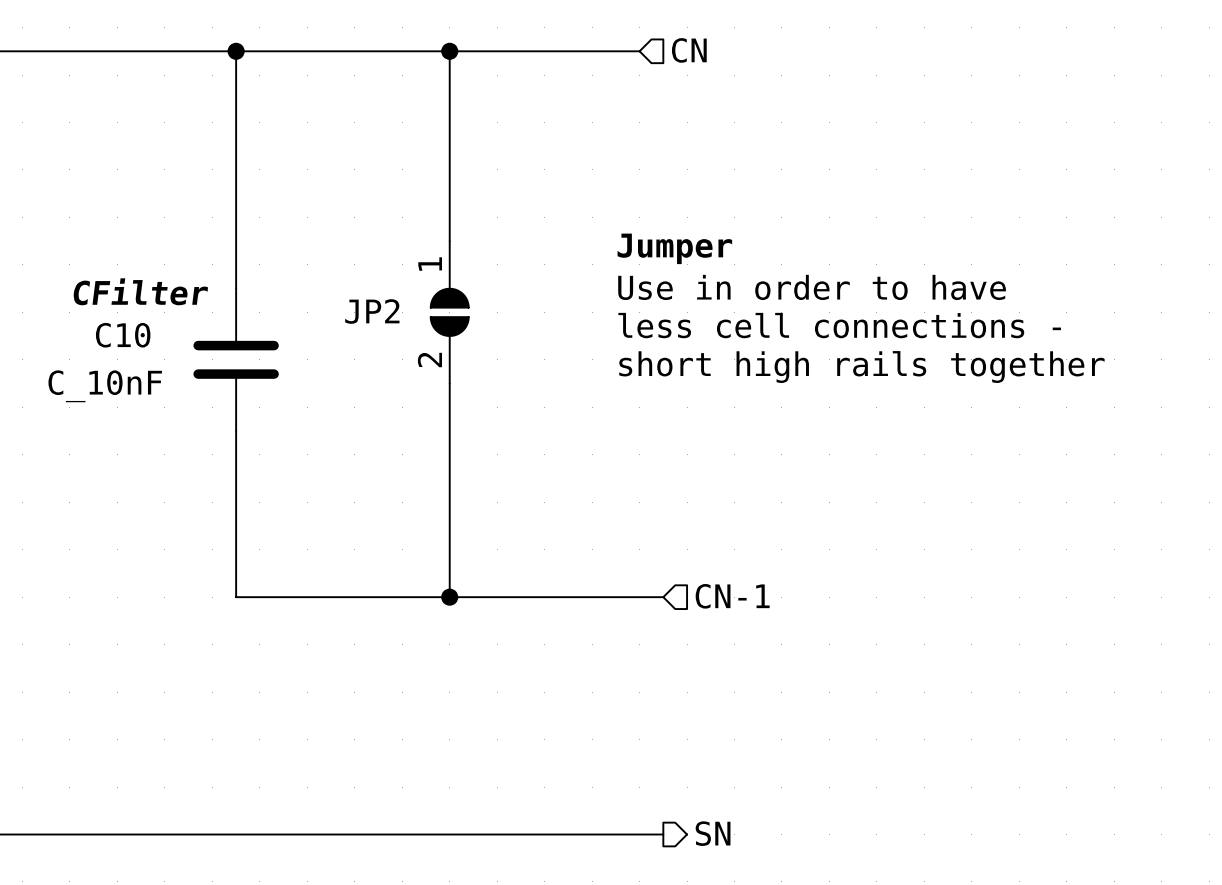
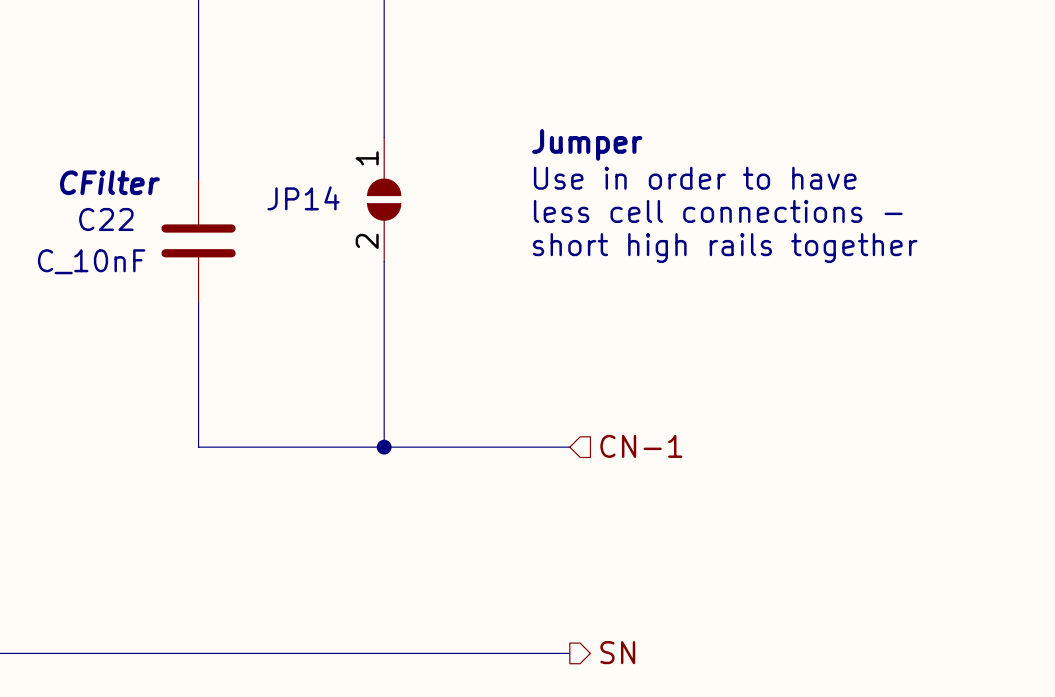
JP2 name: JP2 (372, 311) -> JP14 (303, 198)
C10 name: C10 (123, 335) -> C22 (106, 219)

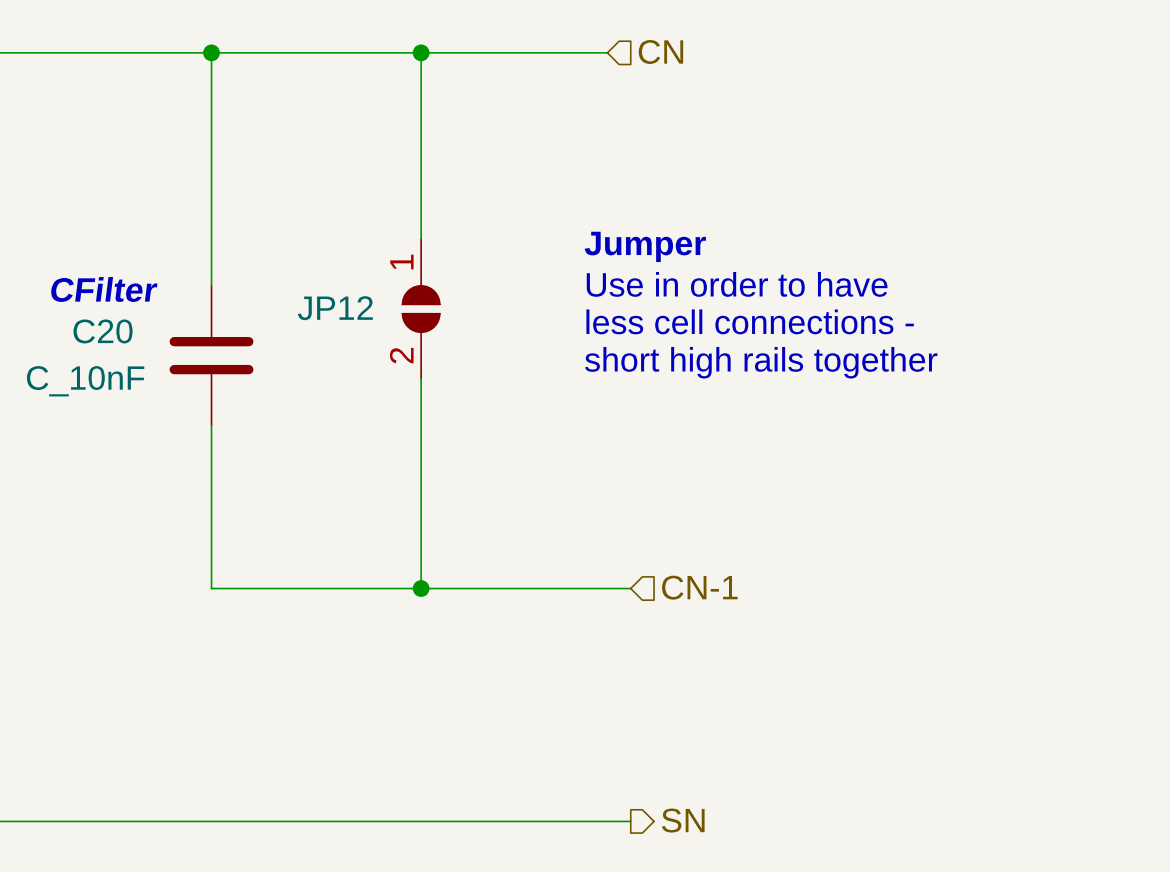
JP14 name: JP14 (303, 198) -> JP12 (335, 308)
C22 name: C22 (106, 219) -> C20 (103, 331)

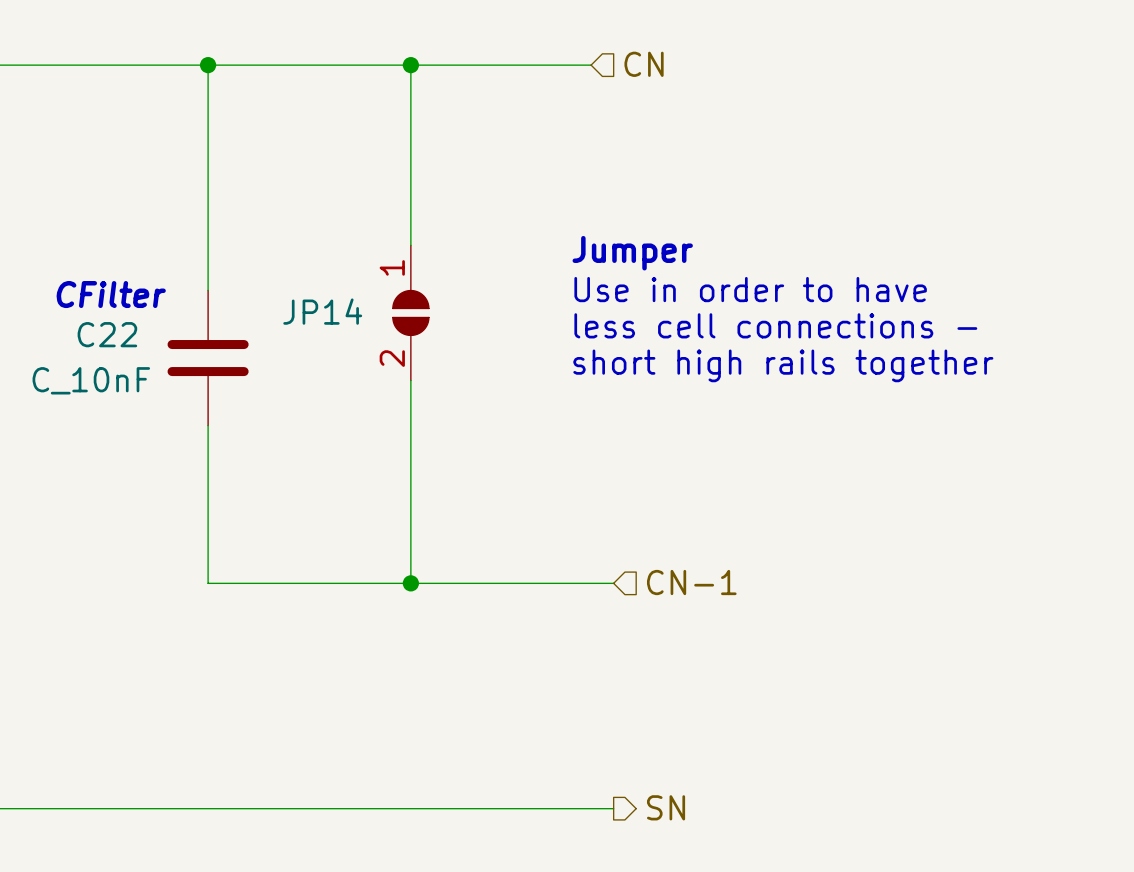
JP12 name: JP12 (335, 308) -> JP14 (322, 311)
C20 name: C20 (103, 331) -> C22 (107, 334)

